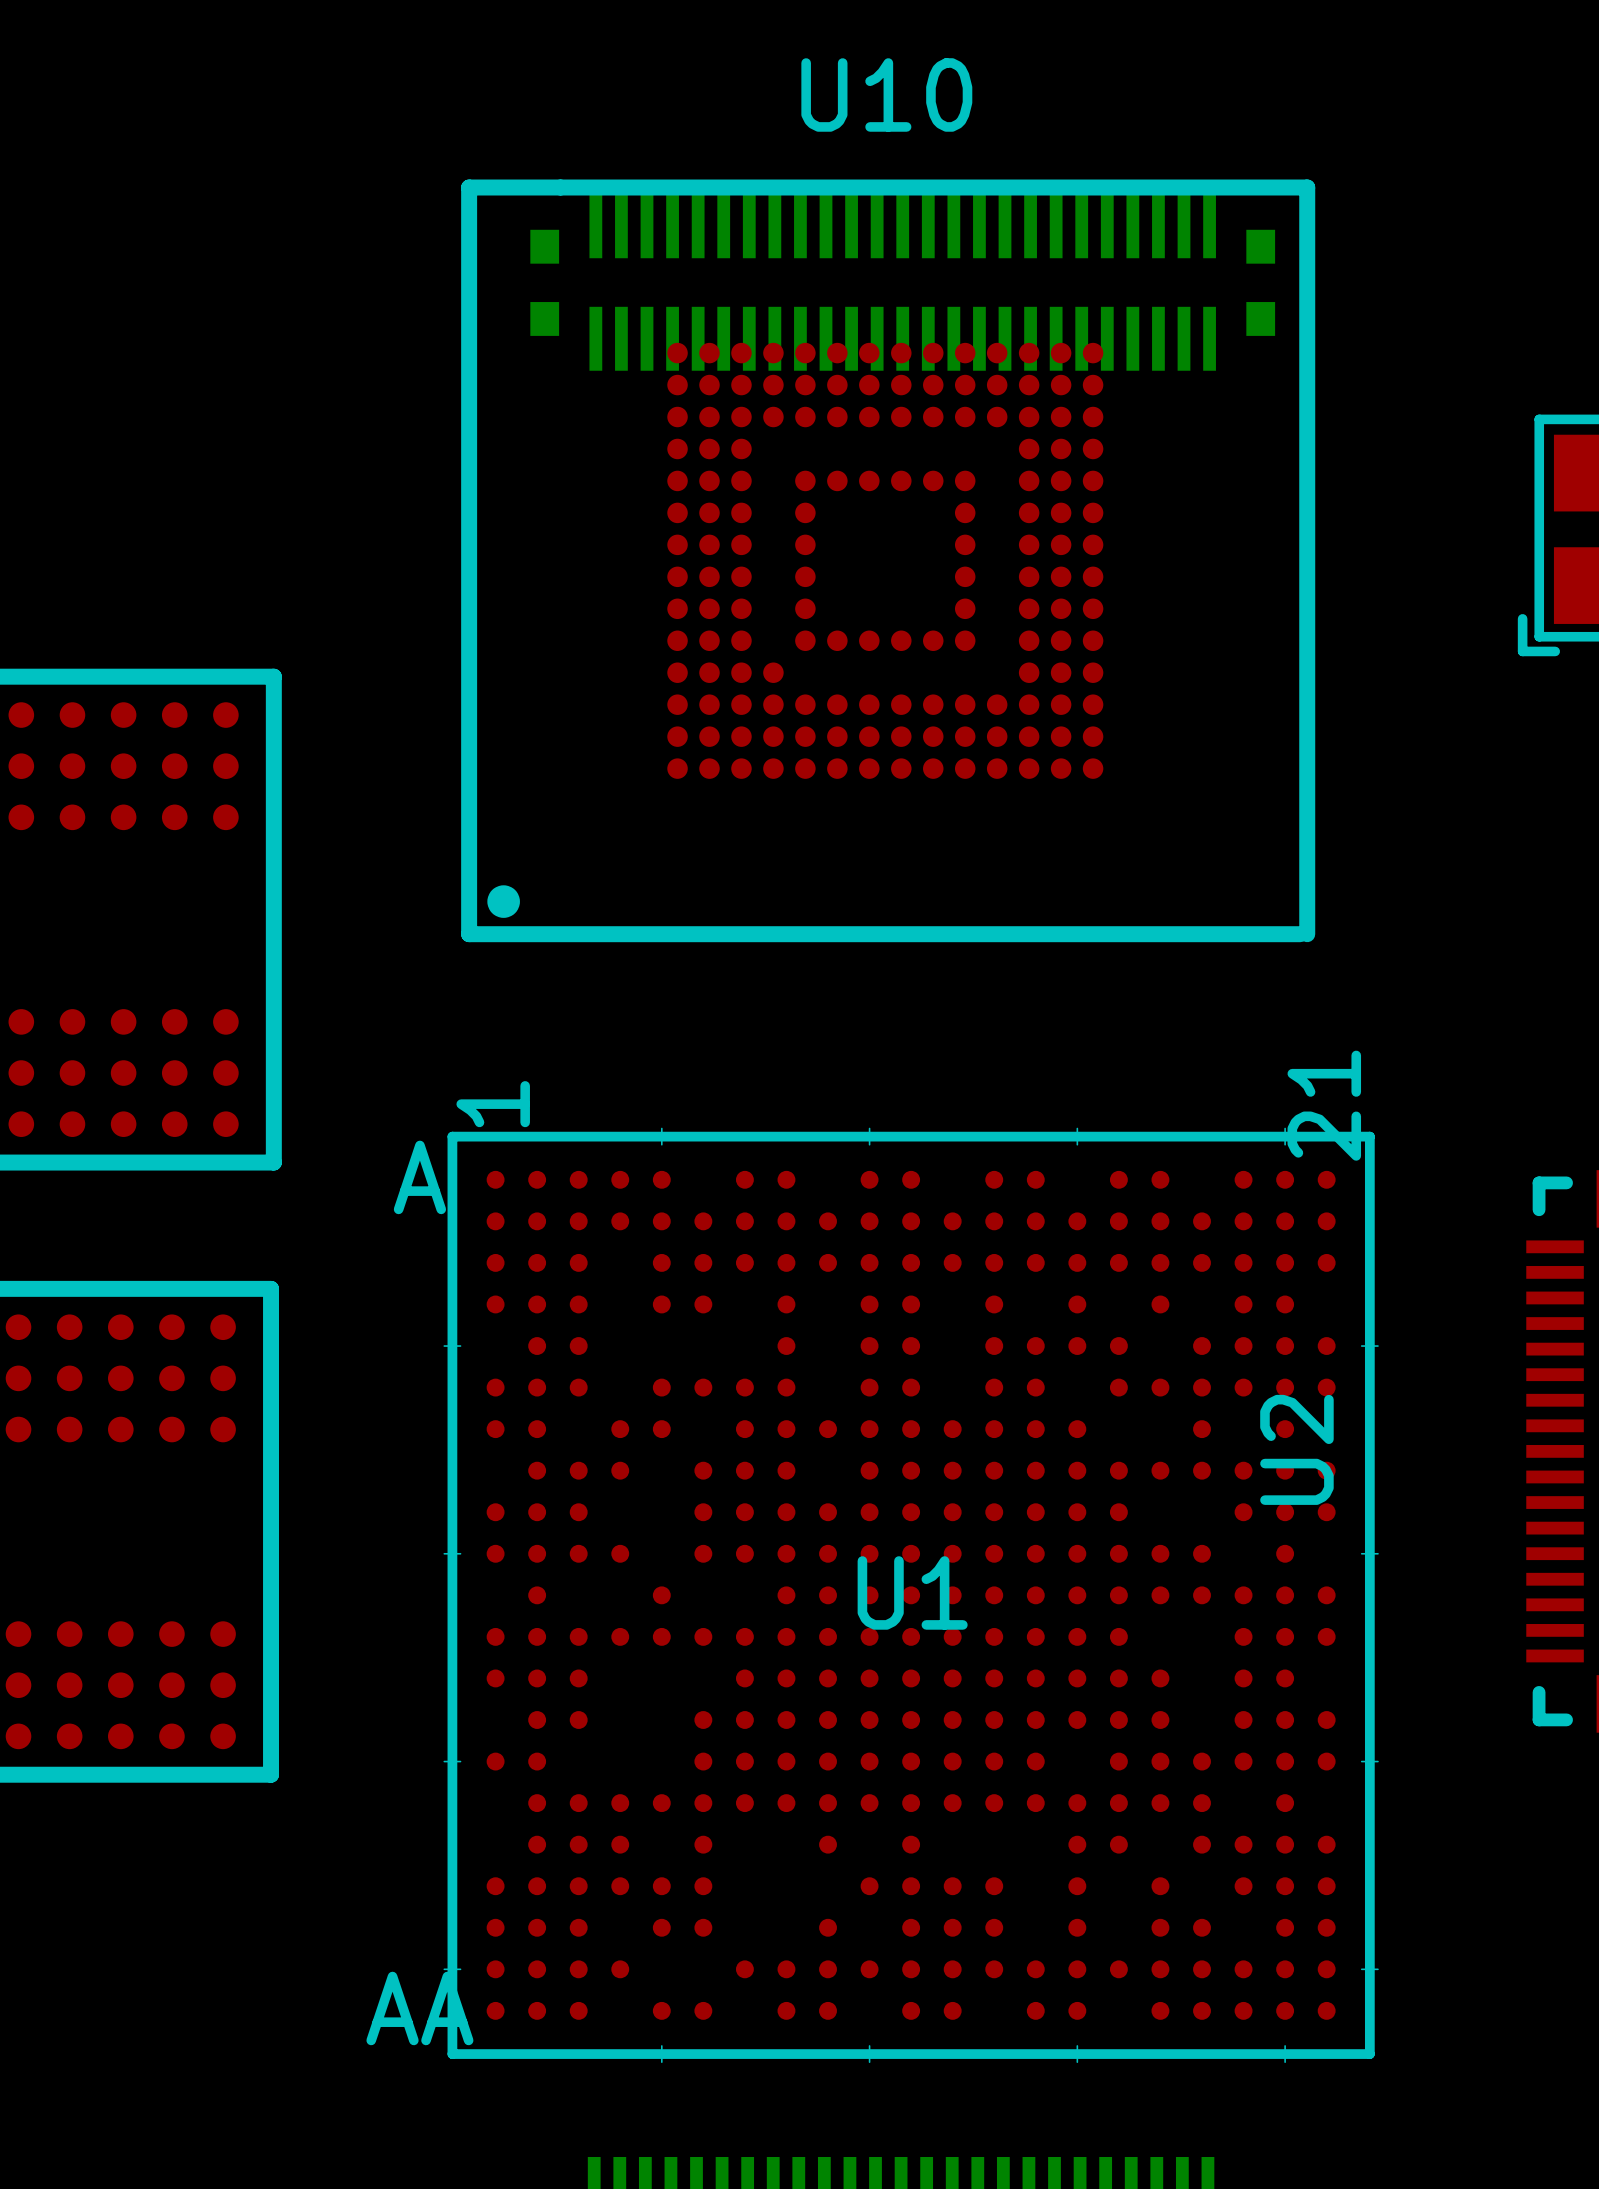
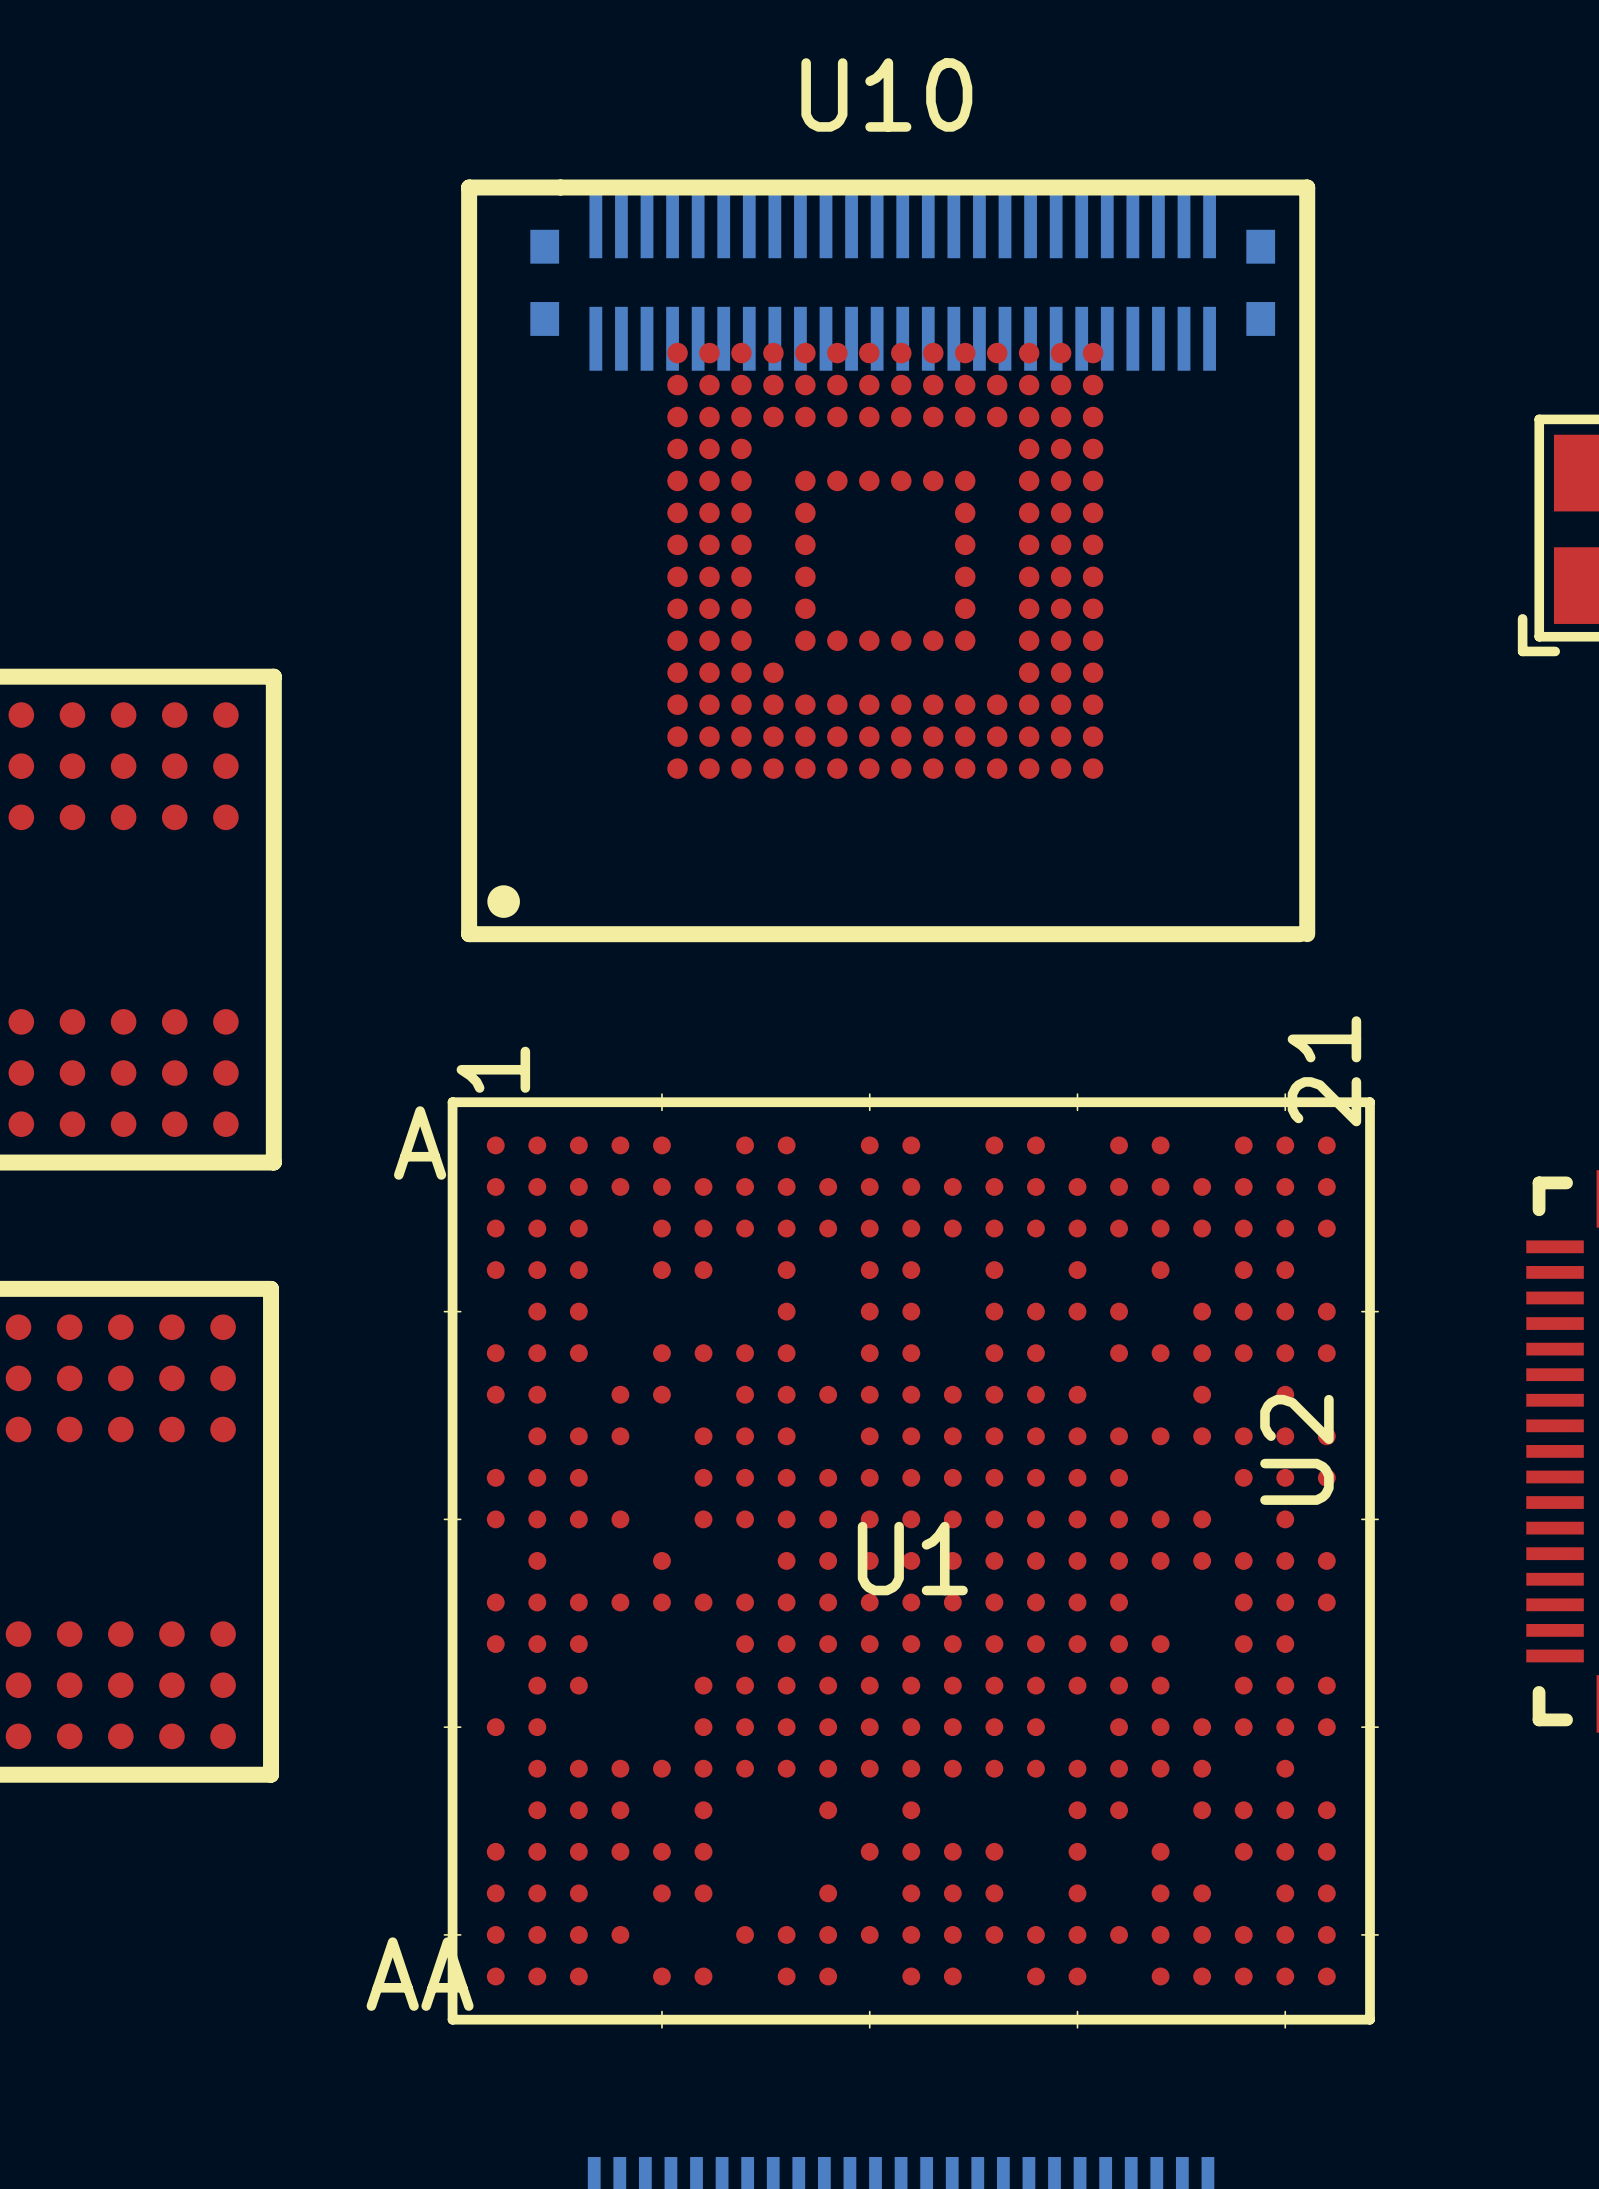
U1 position: (911, 1595) -> (911, 1560)

